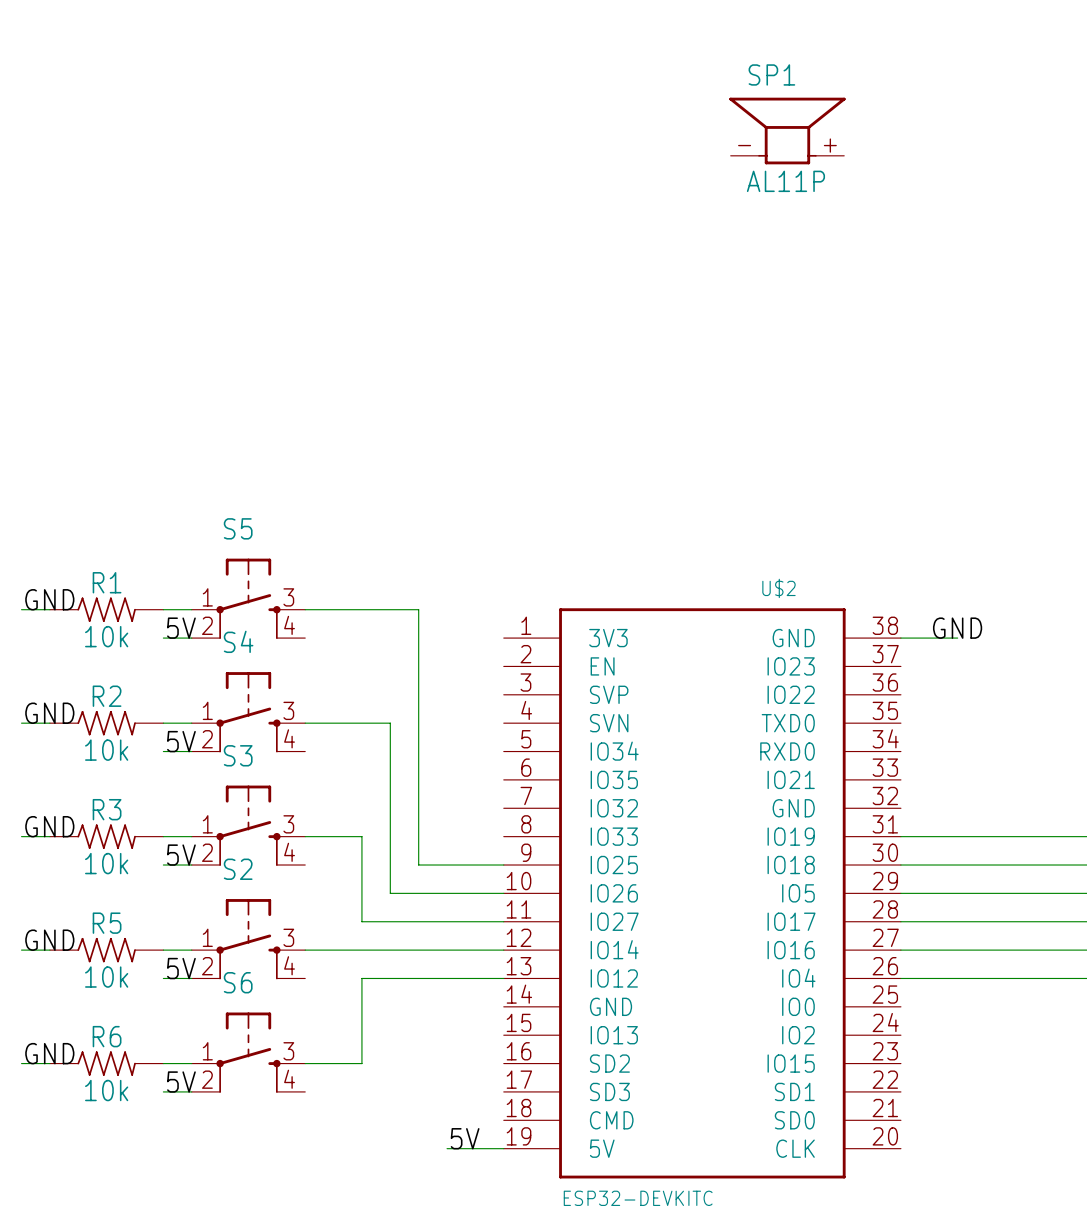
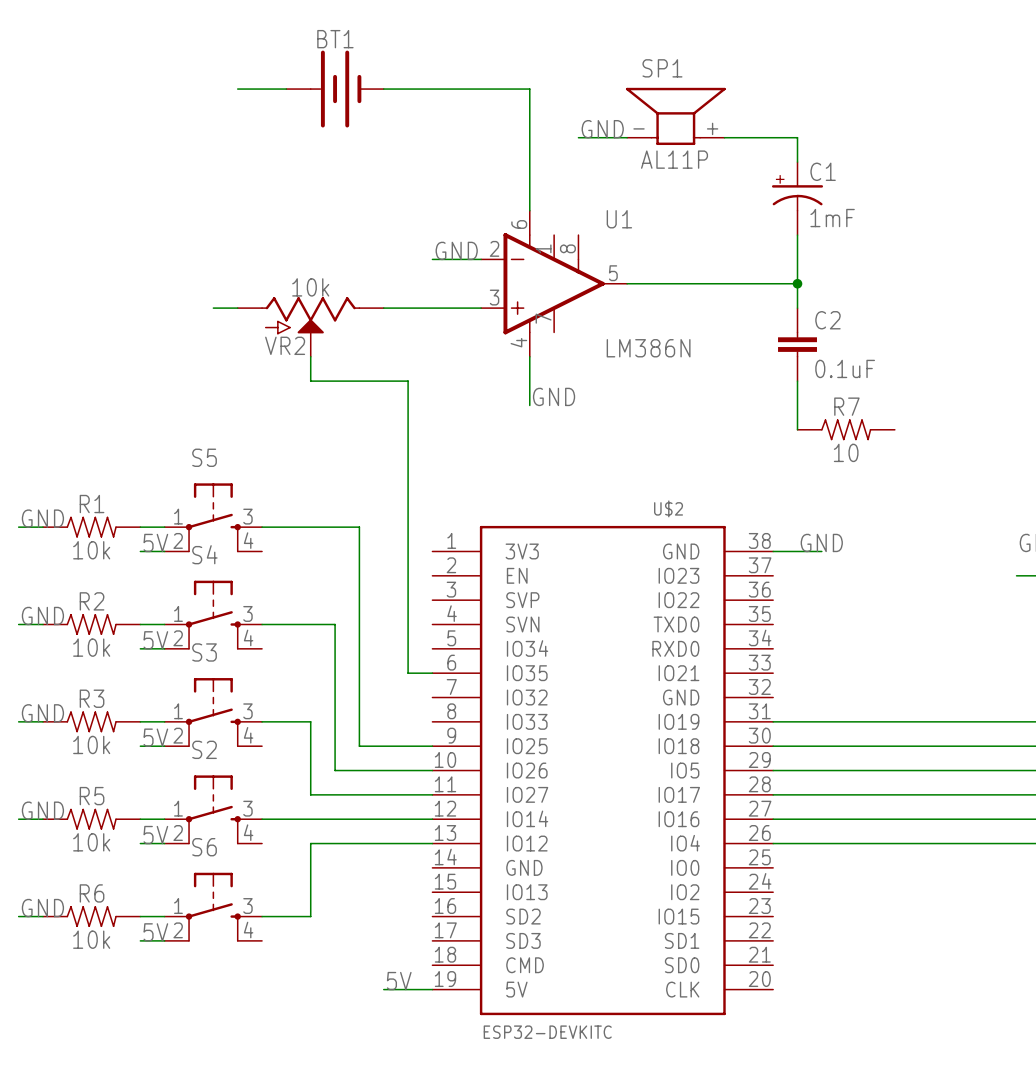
wire: none -> (237, 89) (286, 89)
BT1: none -> (335, 89)
wire: none -> (383, 89) (529, 89) (529, 210)
label: none -> GND (602, 129)
wire: none -> (578, 137) (627, 137)
wire: none -> (724, 137) (797, 137) (797, 162)
C1: none -> 1mF (797, 198)
wire: none -> (797, 235) (797, 308)
label: none -> GND (456, 250)
wire: none -> (432, 259) (481, 259)
U1: none -> LM386N (554, 283)
wire: none -> (627, 283) (797, 283)
junction: none -> (797, 283)
wire: none -> (213, 308) (237, 308)
wire: none -> (383, 308) (481, 308)
VR2: none -> 10k (310, 326)
C2: none -> 0.1uF (797, 344)
wire: none -> (310, 356) (310, 381) (408, 381) (408, 673) (432, 673)
wire: none -> (529, 356) (529, 405)
wire: none -> (797, 381) (797, 429)
label: none -> GND (554, 396)
R7: none -> 10 (846, 429)

